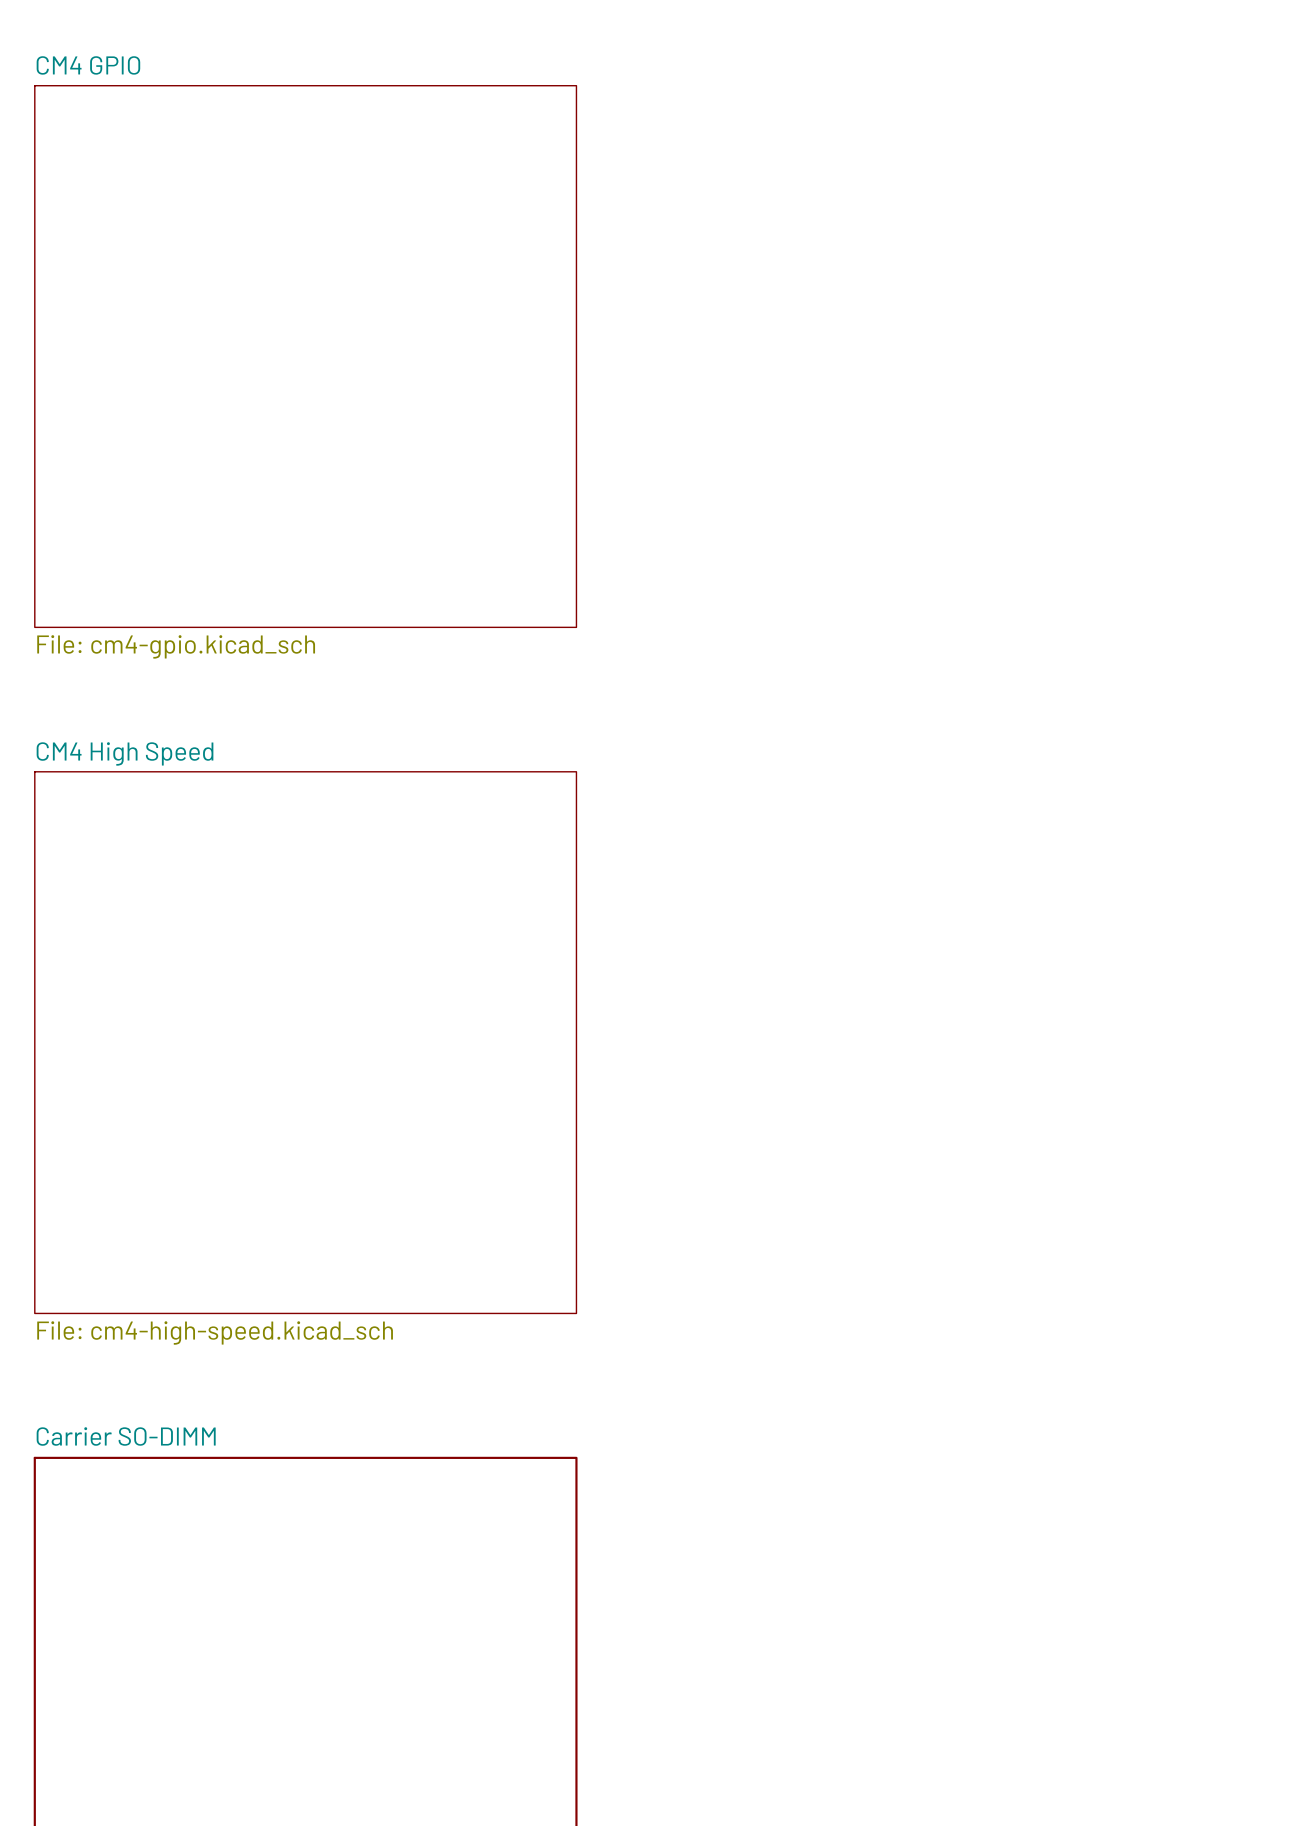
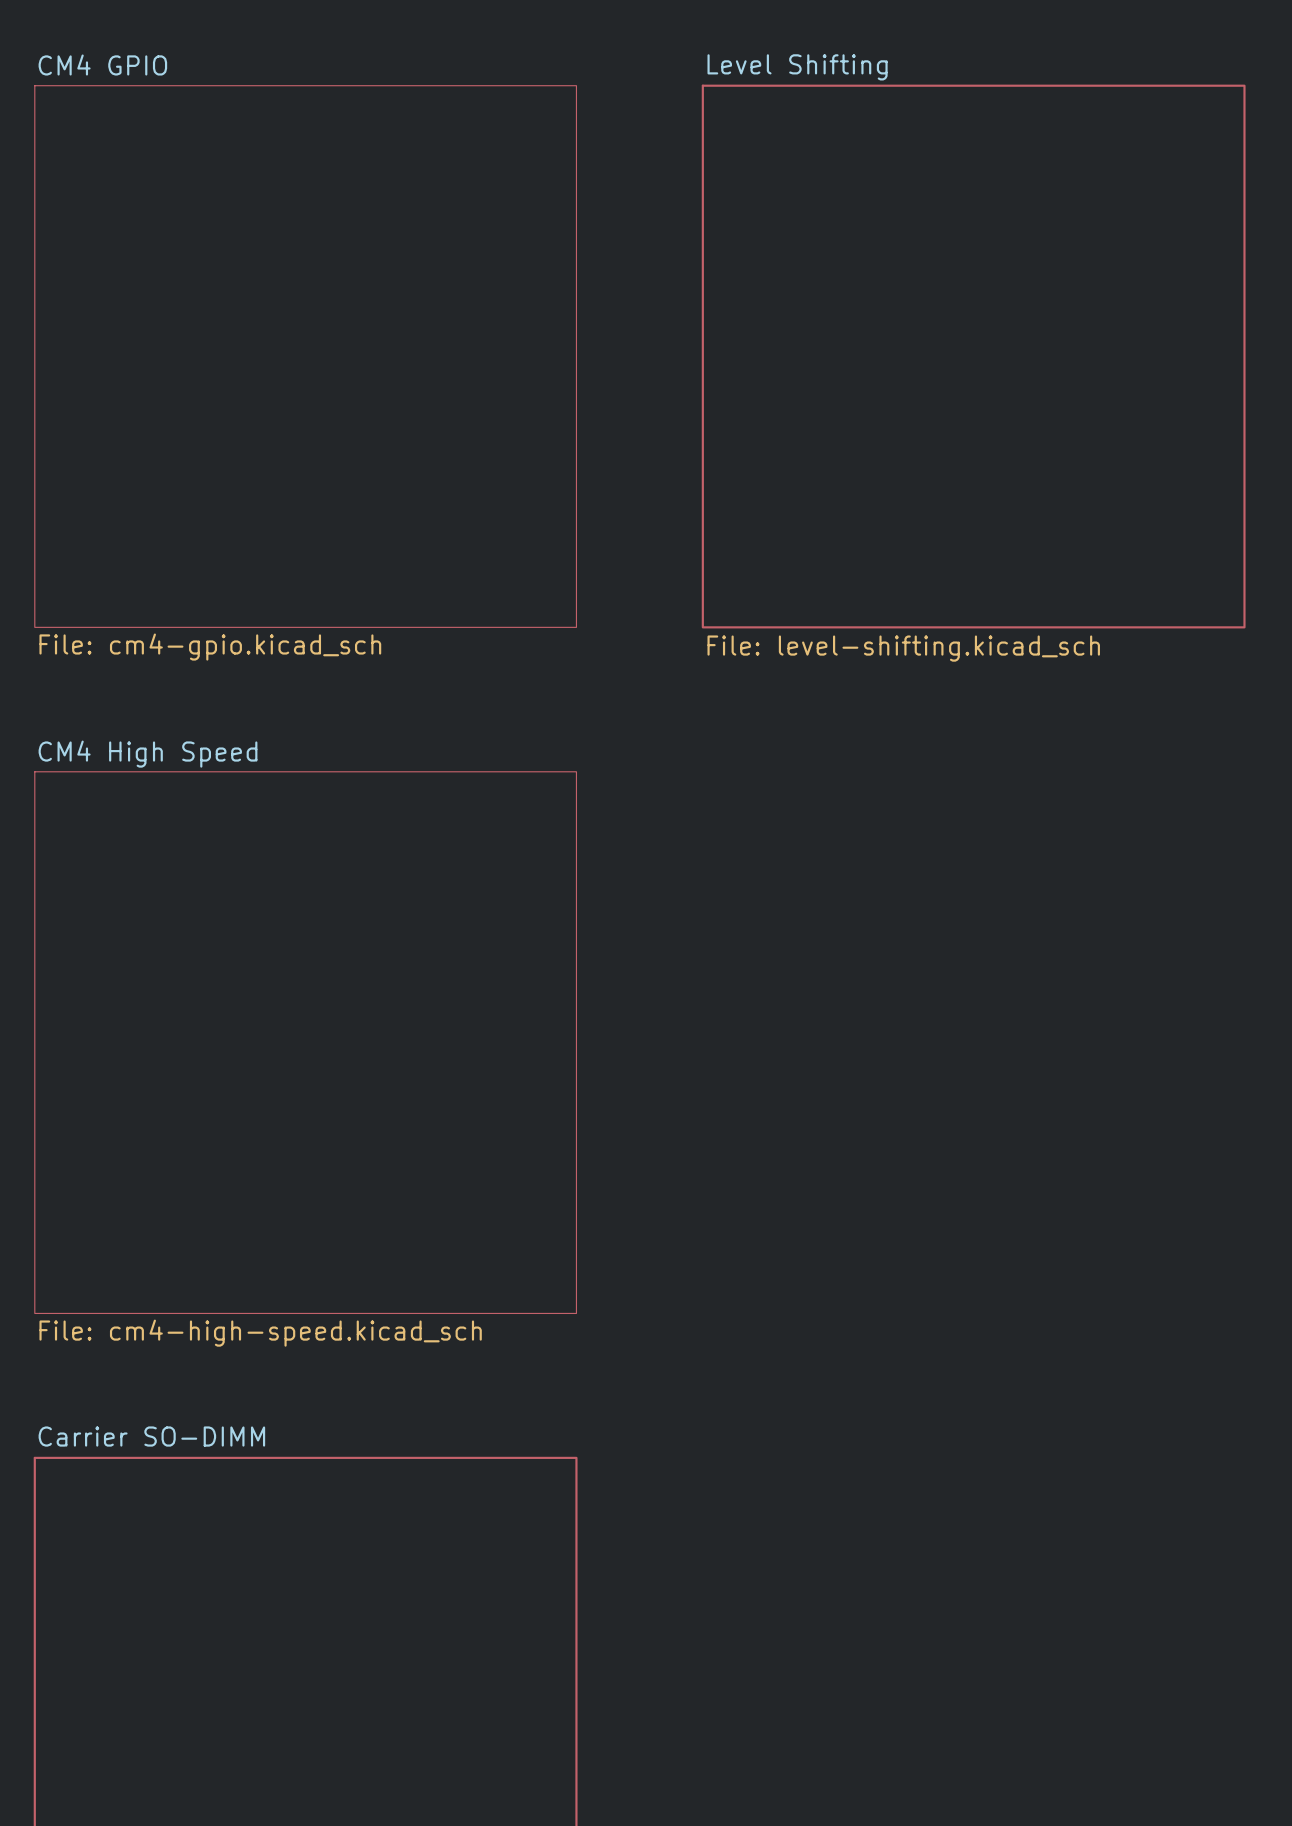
sheet Level Shifting: none -> File: level-shifting.kicad_sch (973, 356)

